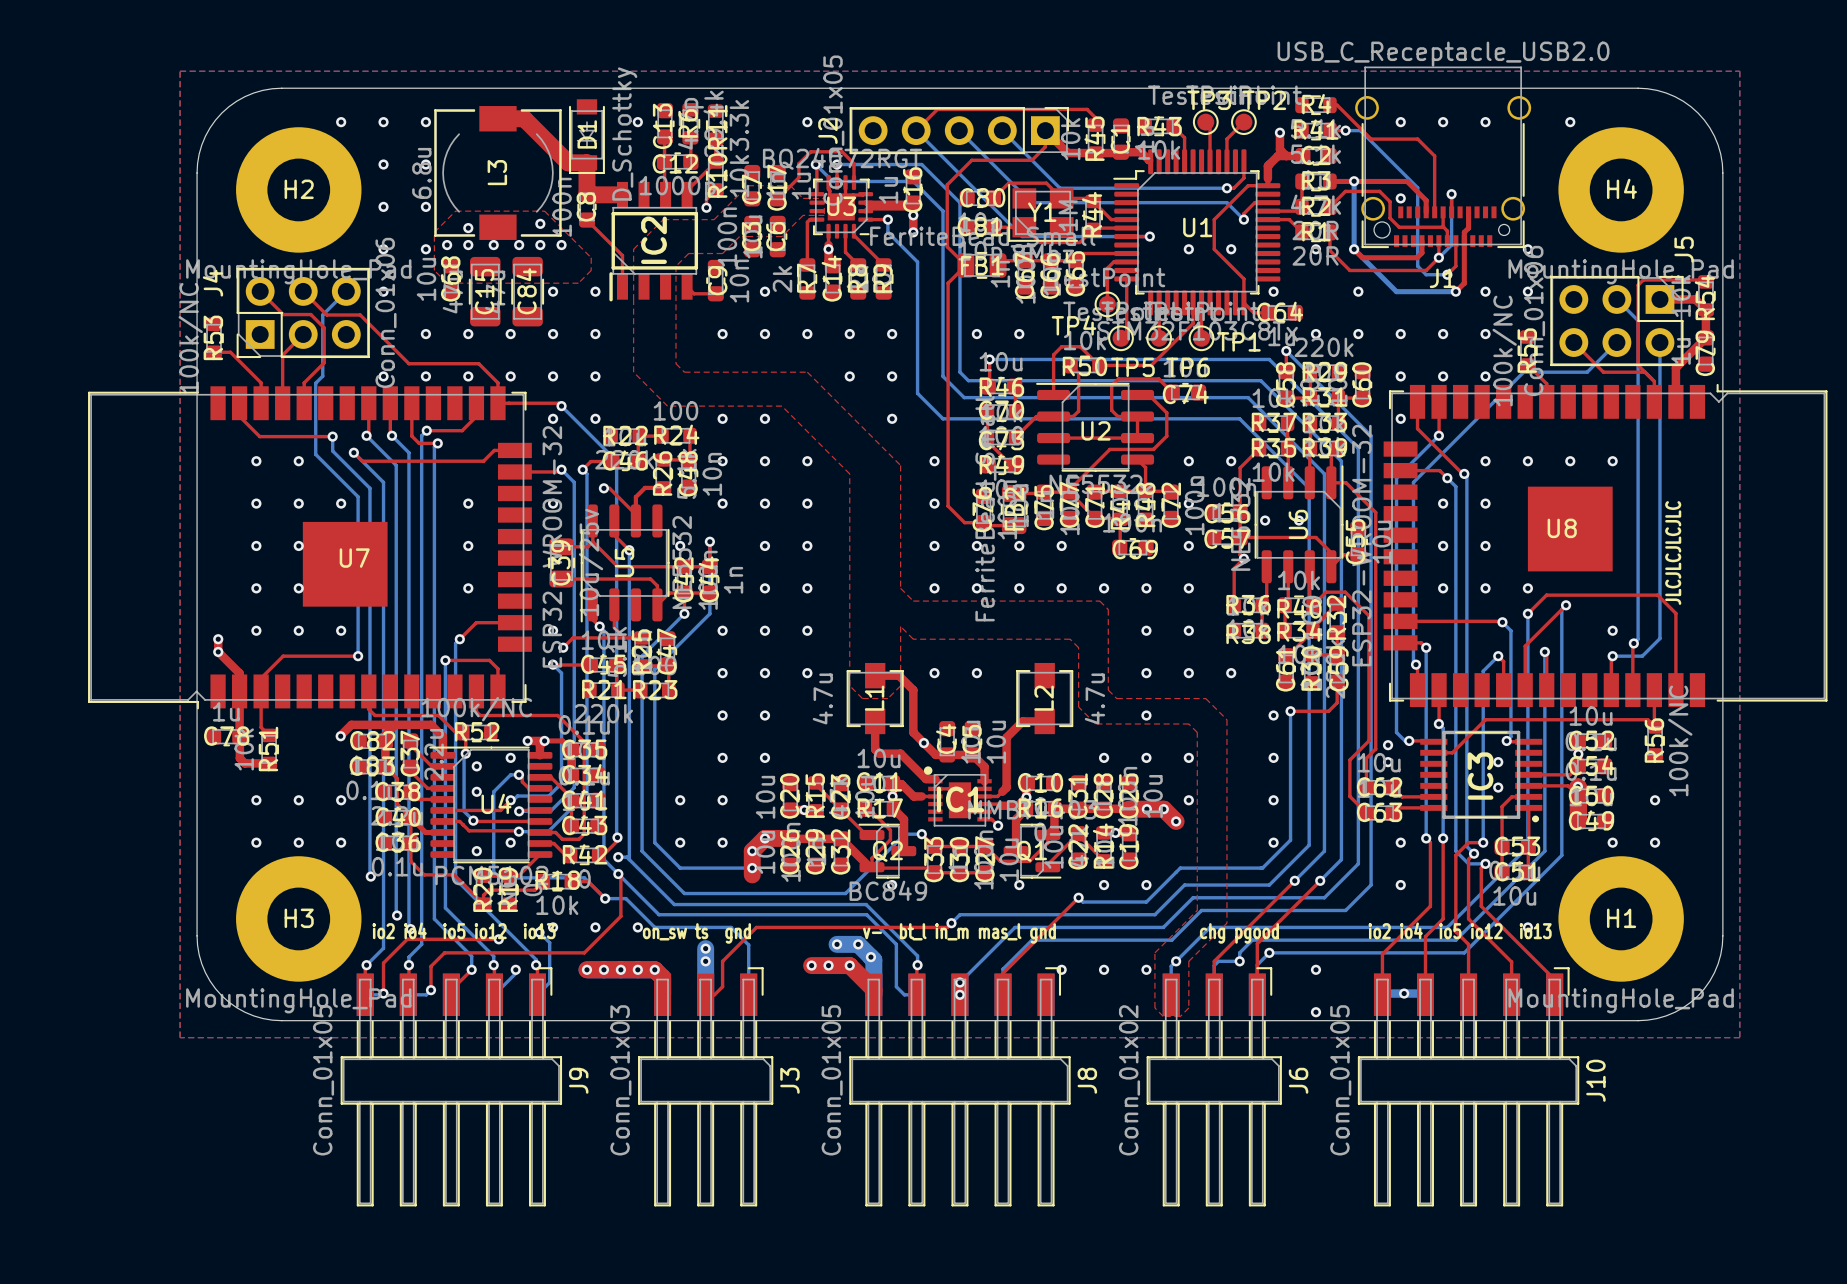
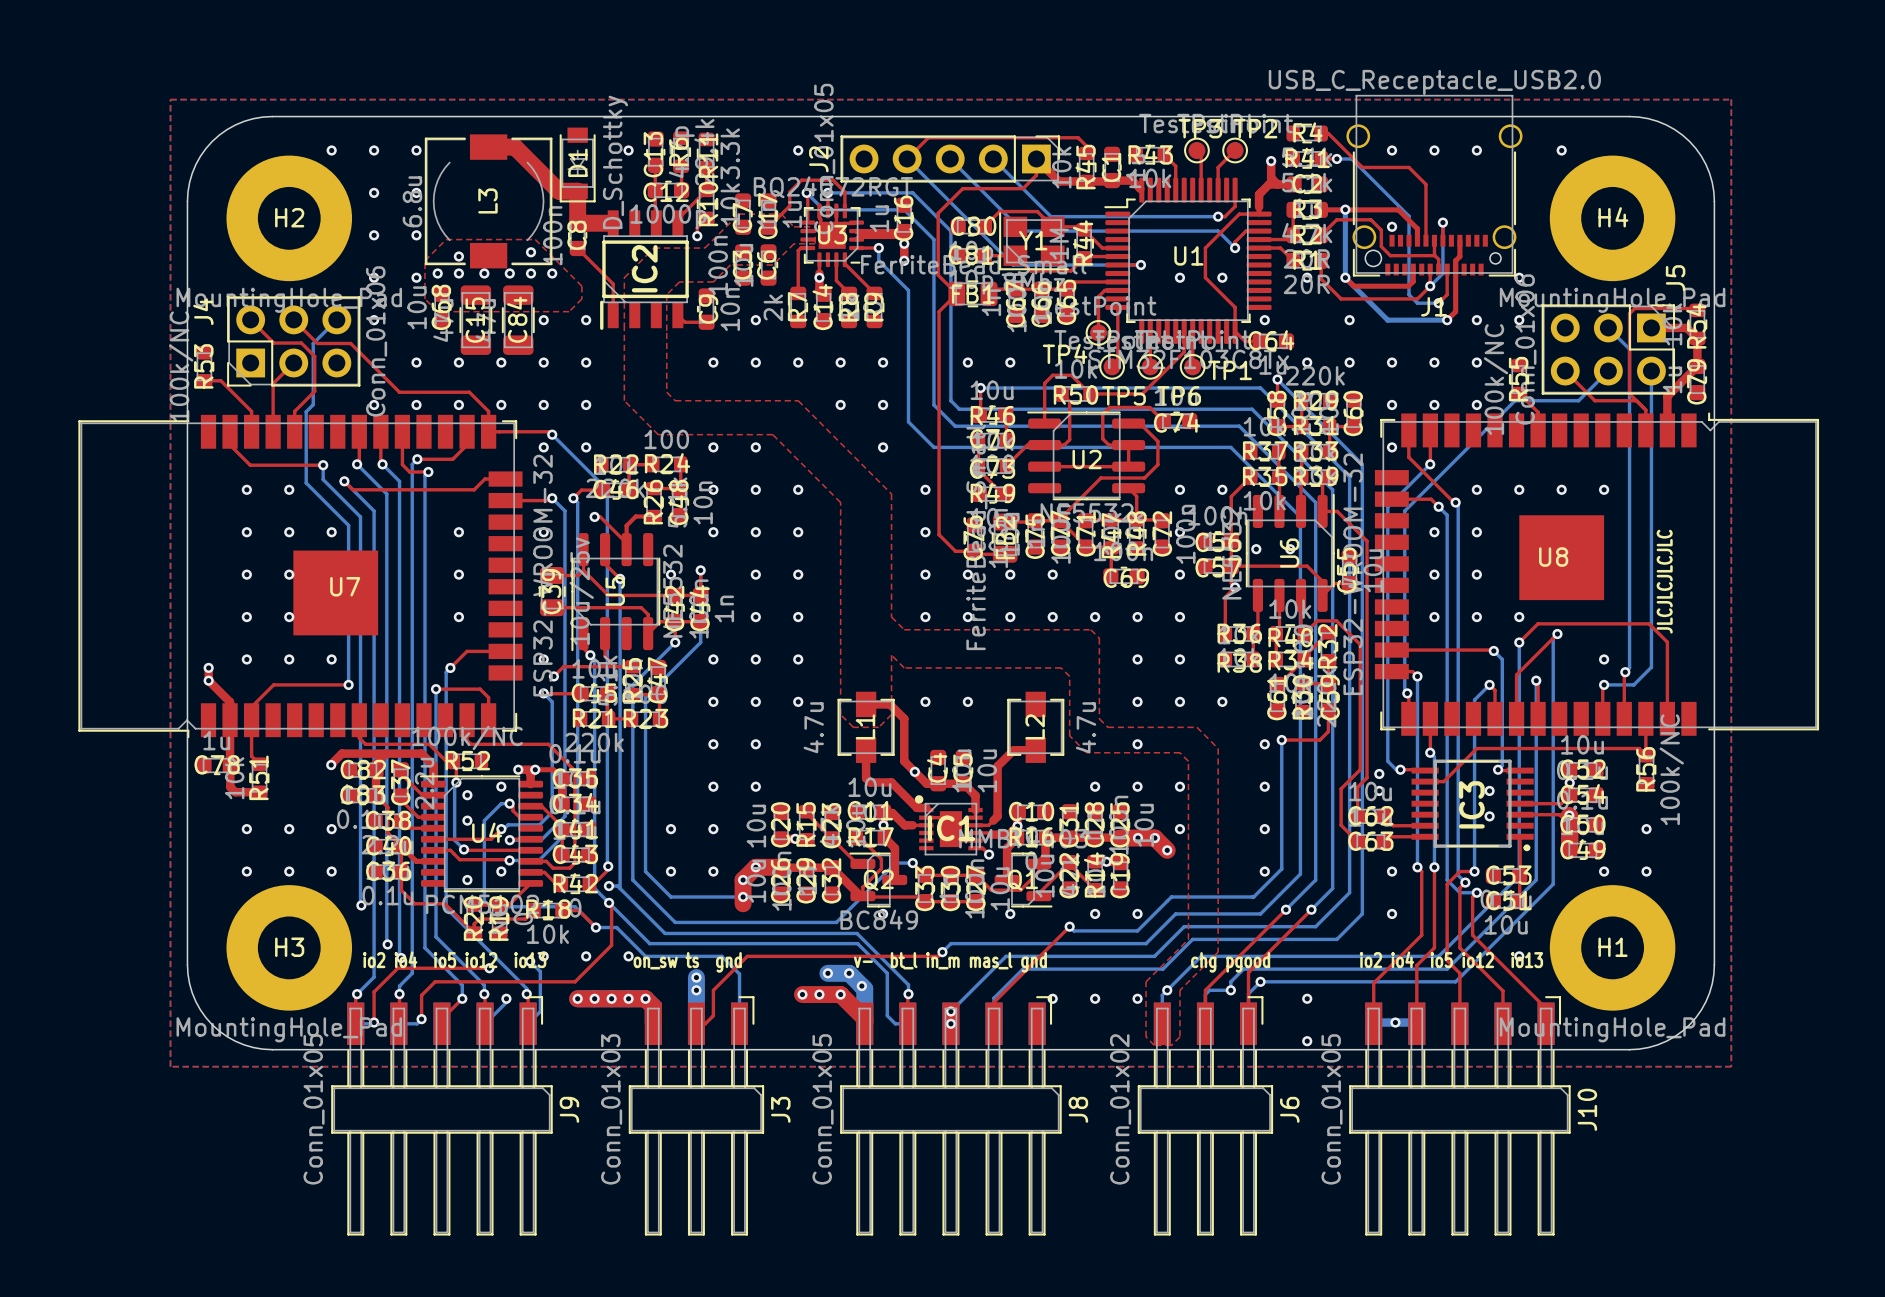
top track: (1528, 796) (1511, 796) (1502, 806) (1502, 872) -> none

